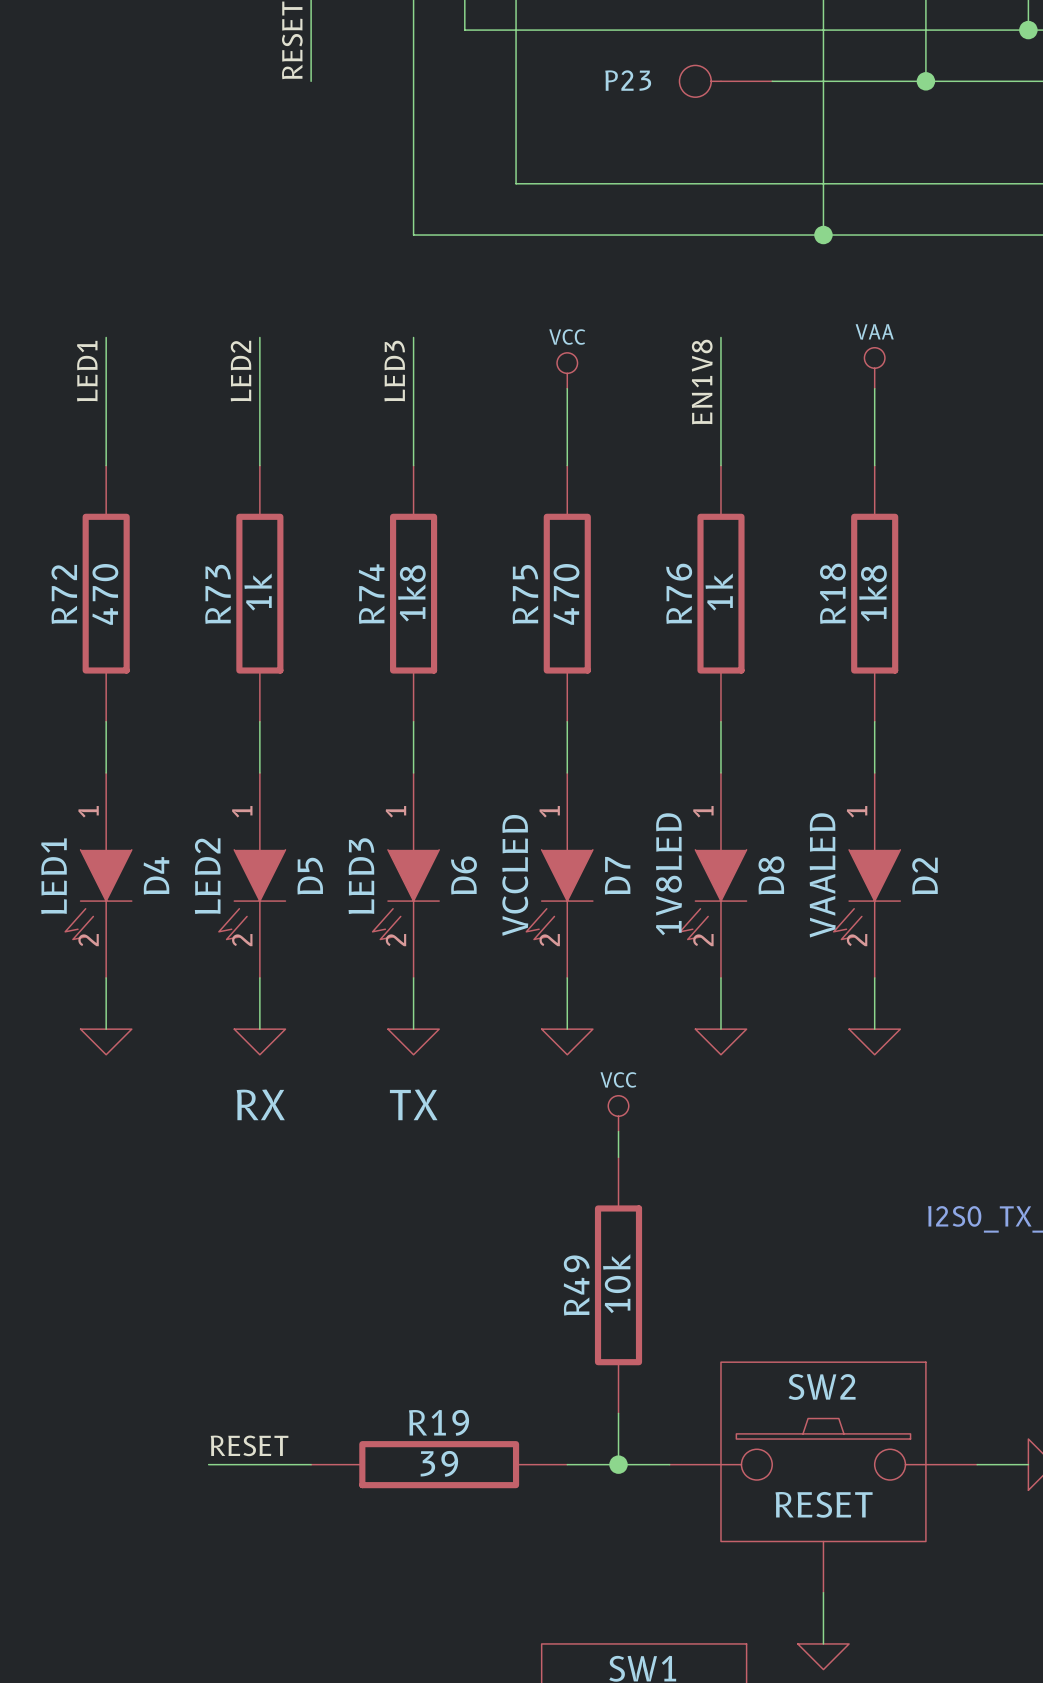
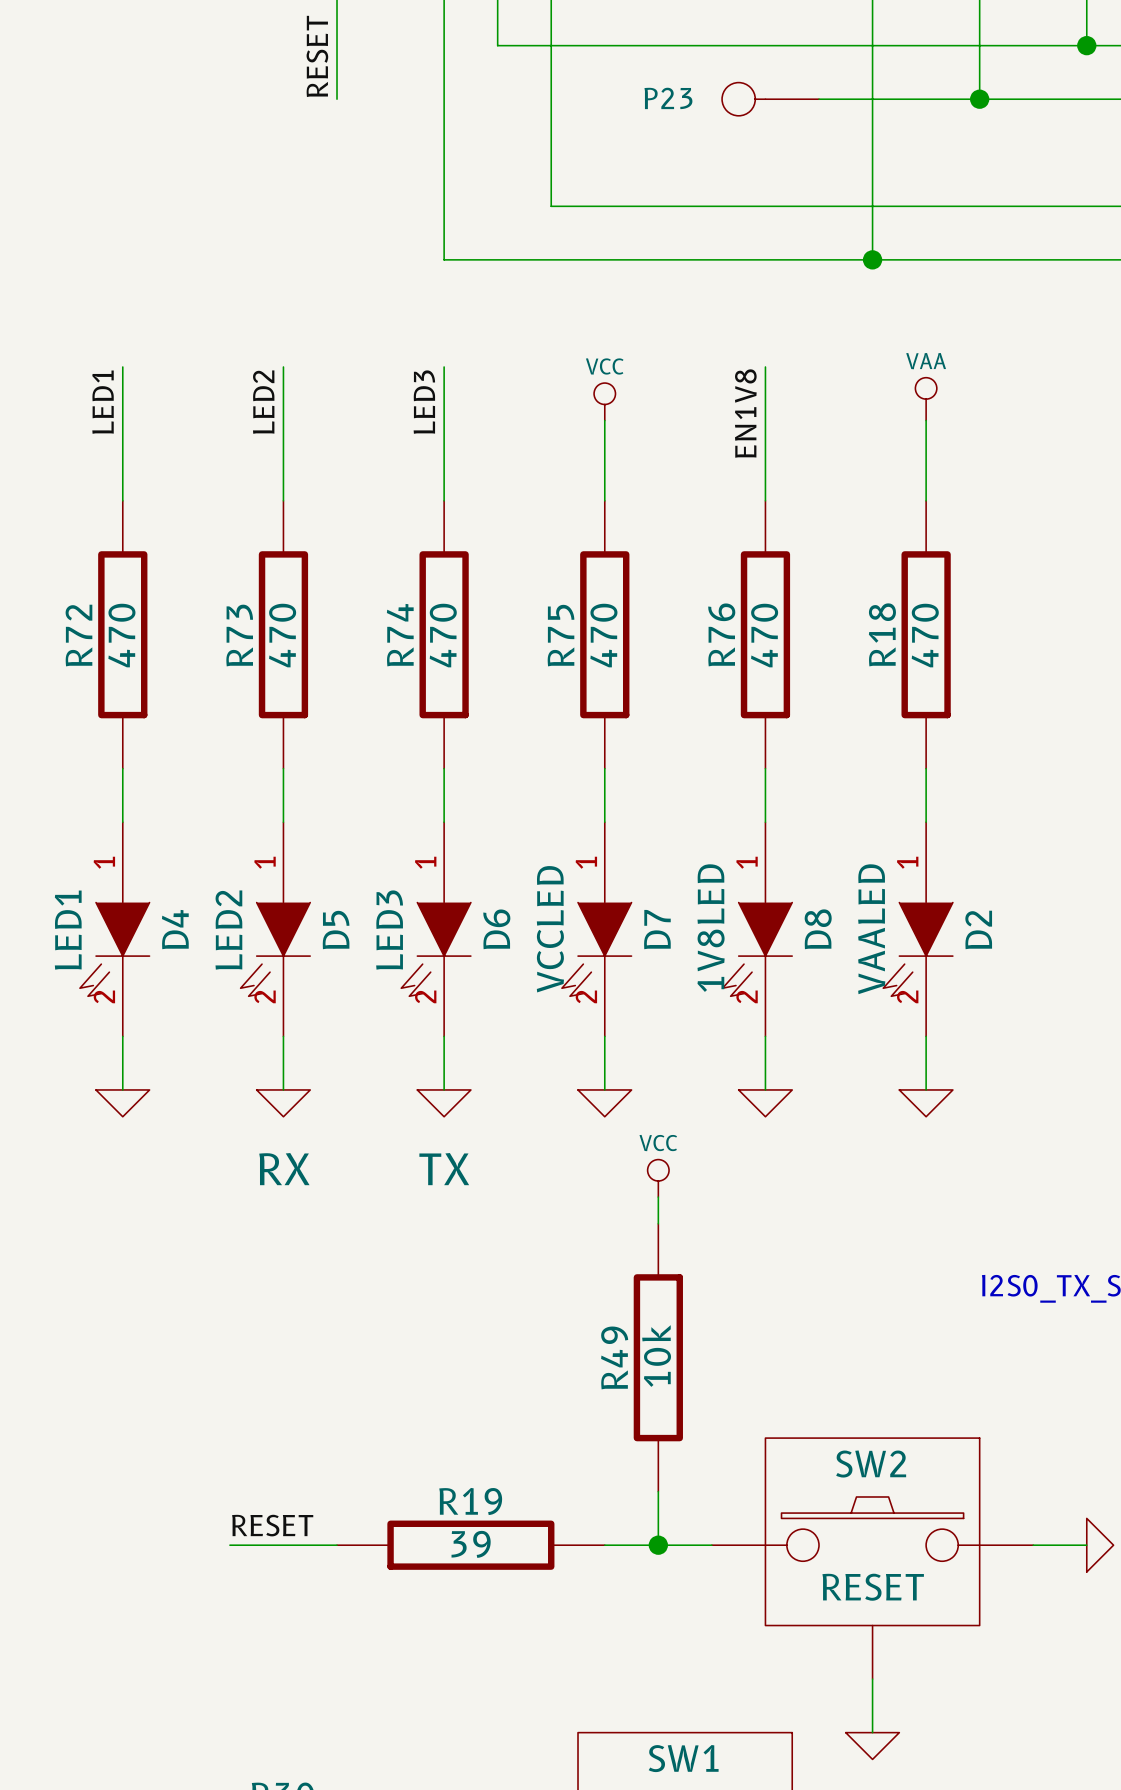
R73 value: 1k (258, 592) -> 470 (282, 635)
R76 value: 1k (719, 592) -> 470 (764, 635)
R74 value: 1k8 (411, 593) -> 470 (443, 635)
R18 value: 1k8 (873, 593) -> 470 (925, 635)

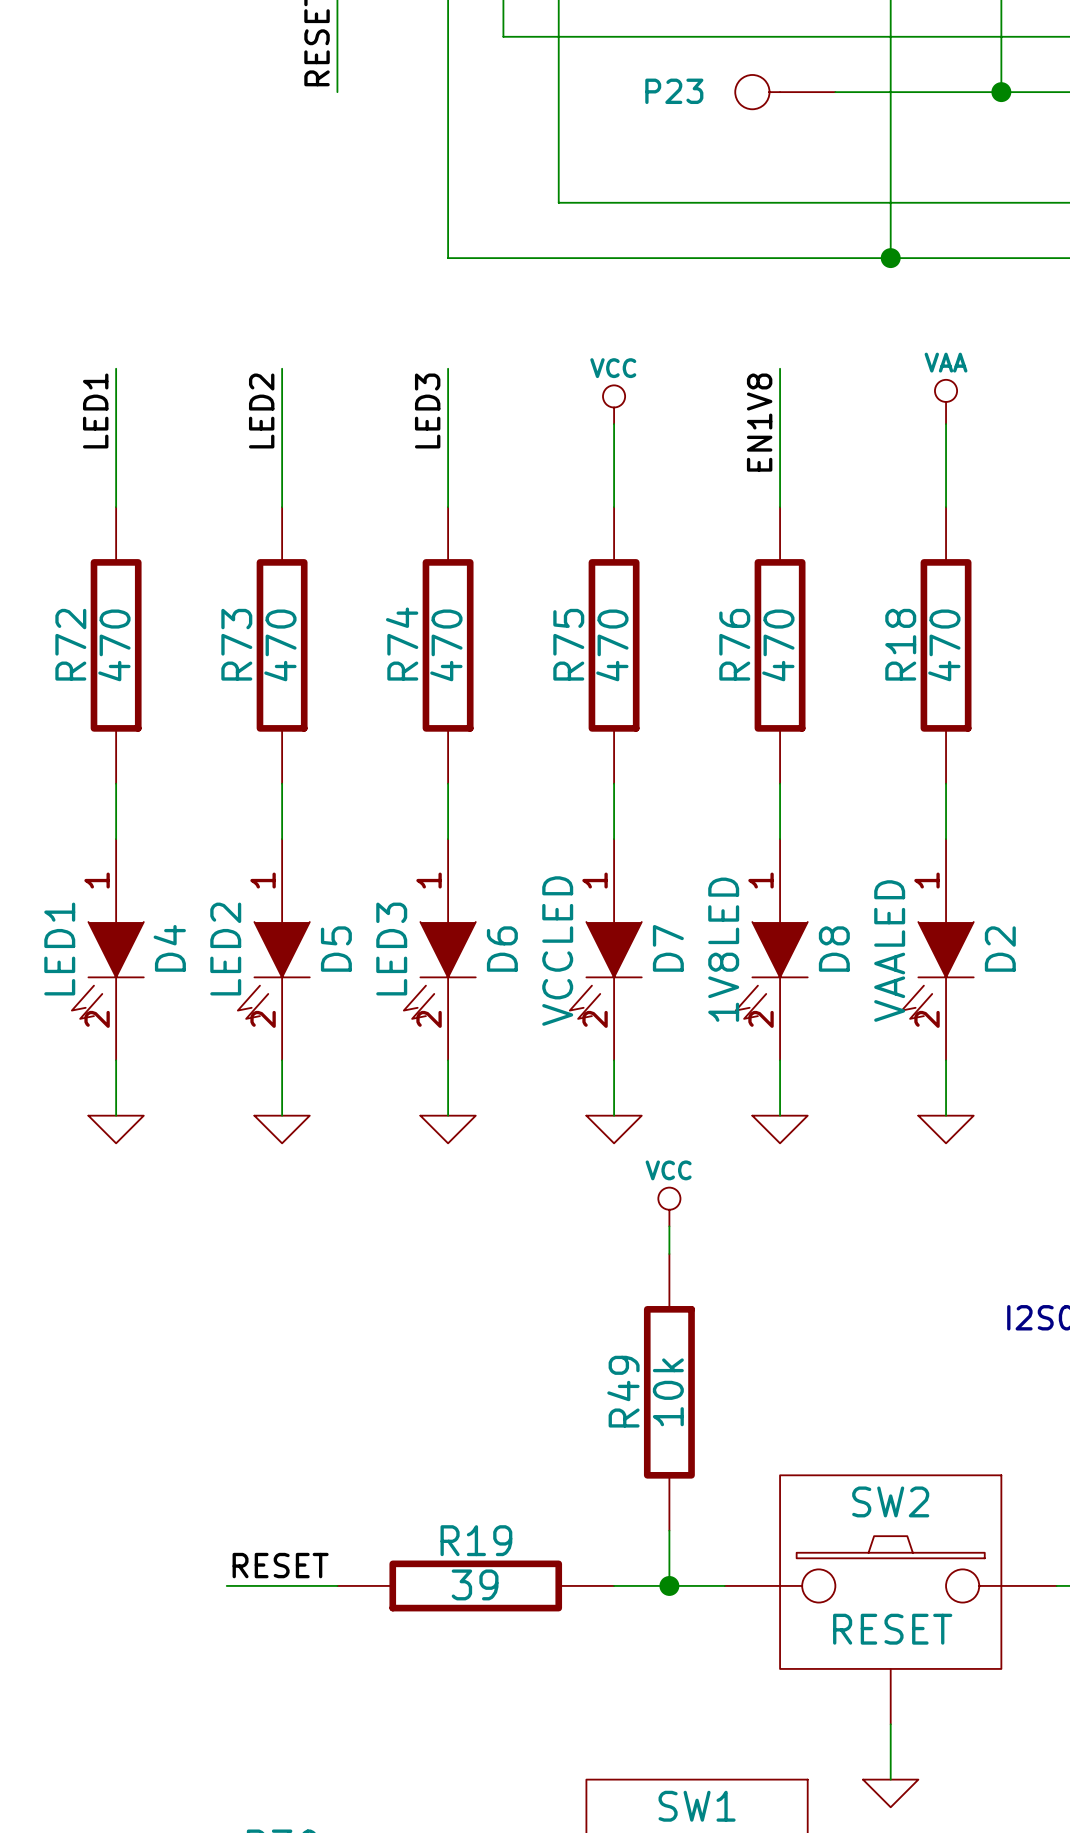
D5 text: RX (284, 1169) -> none
D6 text: TX (444, 1169) -> none

